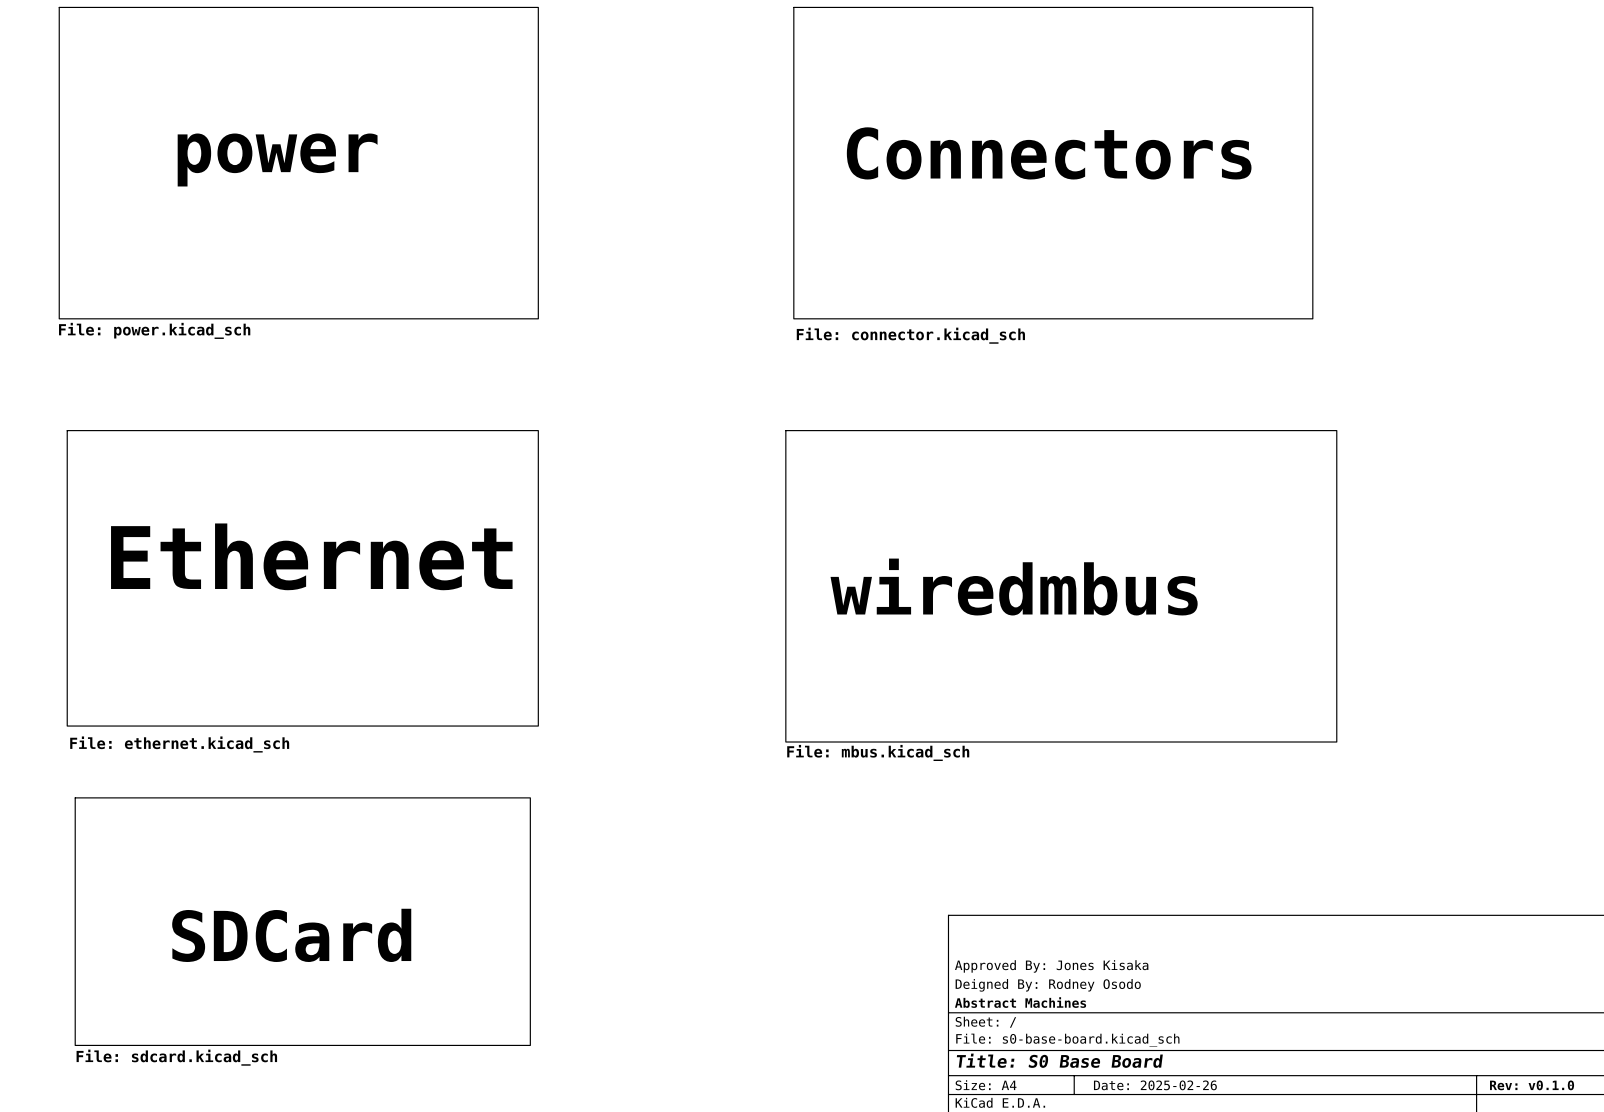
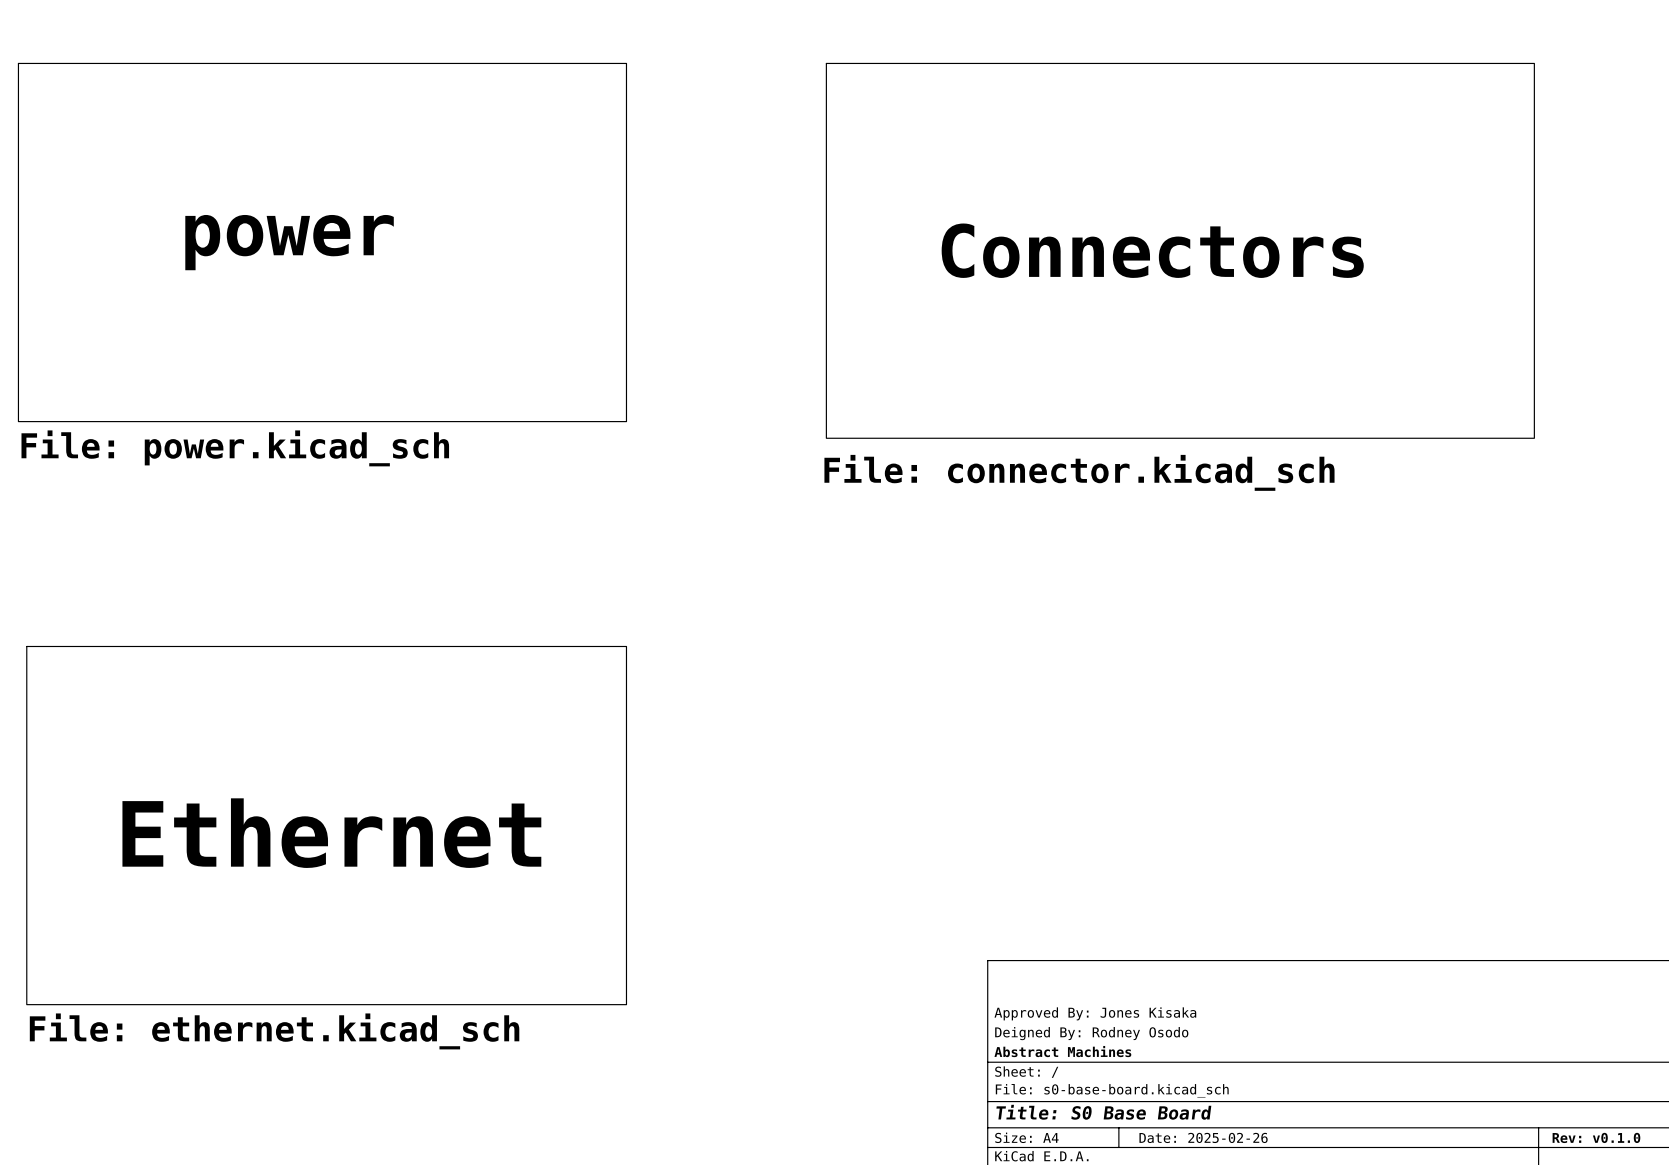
sheet power: File: power.kicad_sch (298, 163) -> none
sheet Connectors: File: connector.kicad_sch (1053, 163) -> none
sheet power: none -> File: power.kicad_sch (322, 242)
sheet Connectors: none -> File: connector.kicad_sch (1180, 250)
sheet Ethernet: File: ethernet.kicad_sch (302, 578) -> none
sheet wiredmbus: File: mbus.kicad_sch (1061, 586) -> none
sheet Ethernet: none -> File: ethernet.kicad_sch (326, 825)
sheet SDCard: File: sdcard.kicad_sch (302, 921) -> none

